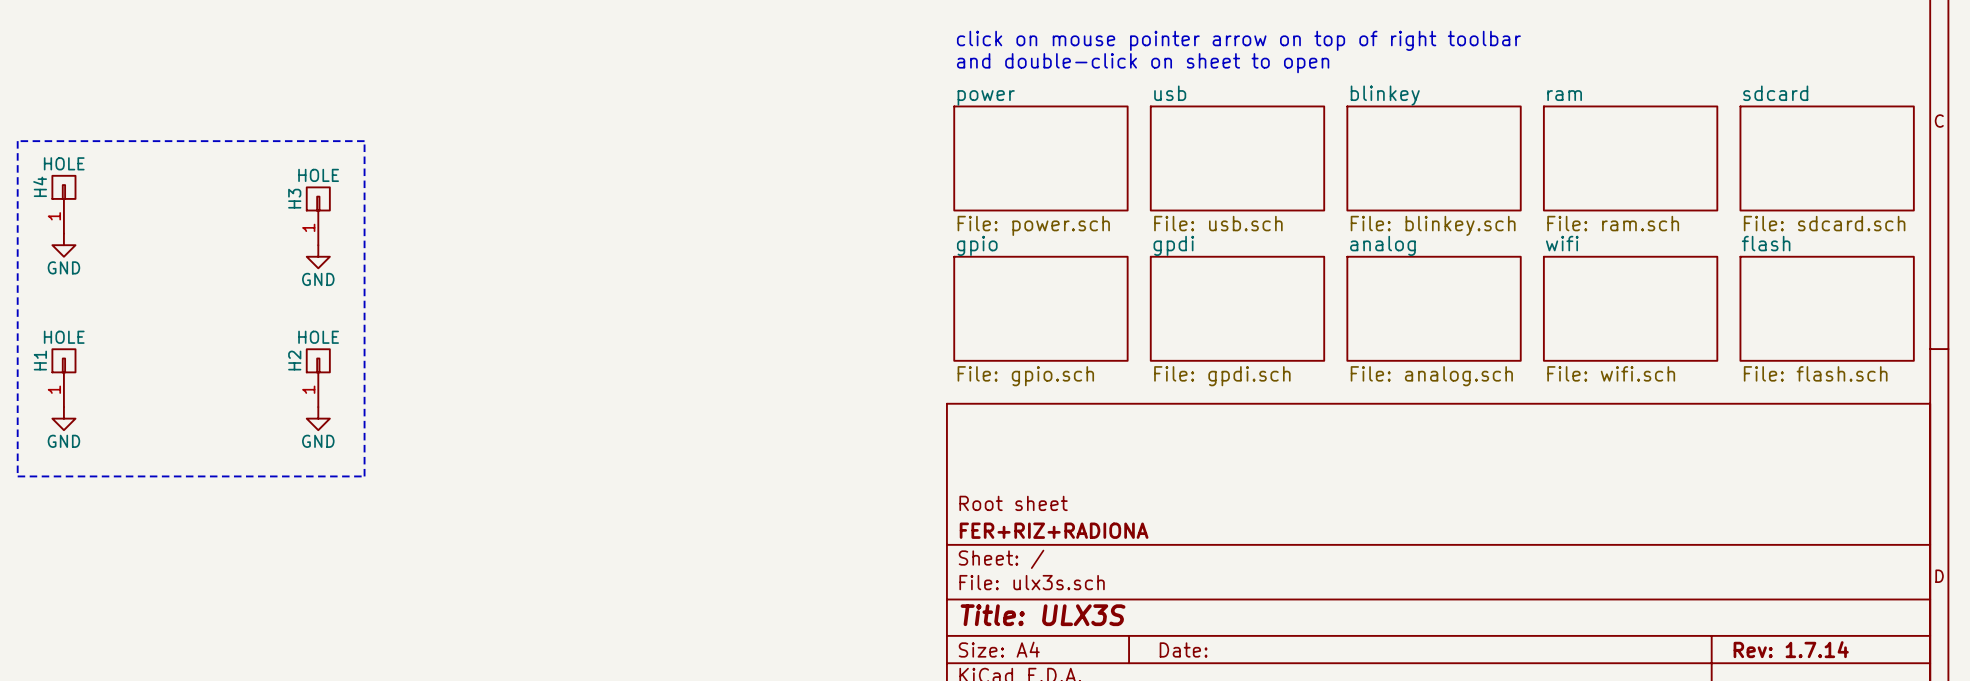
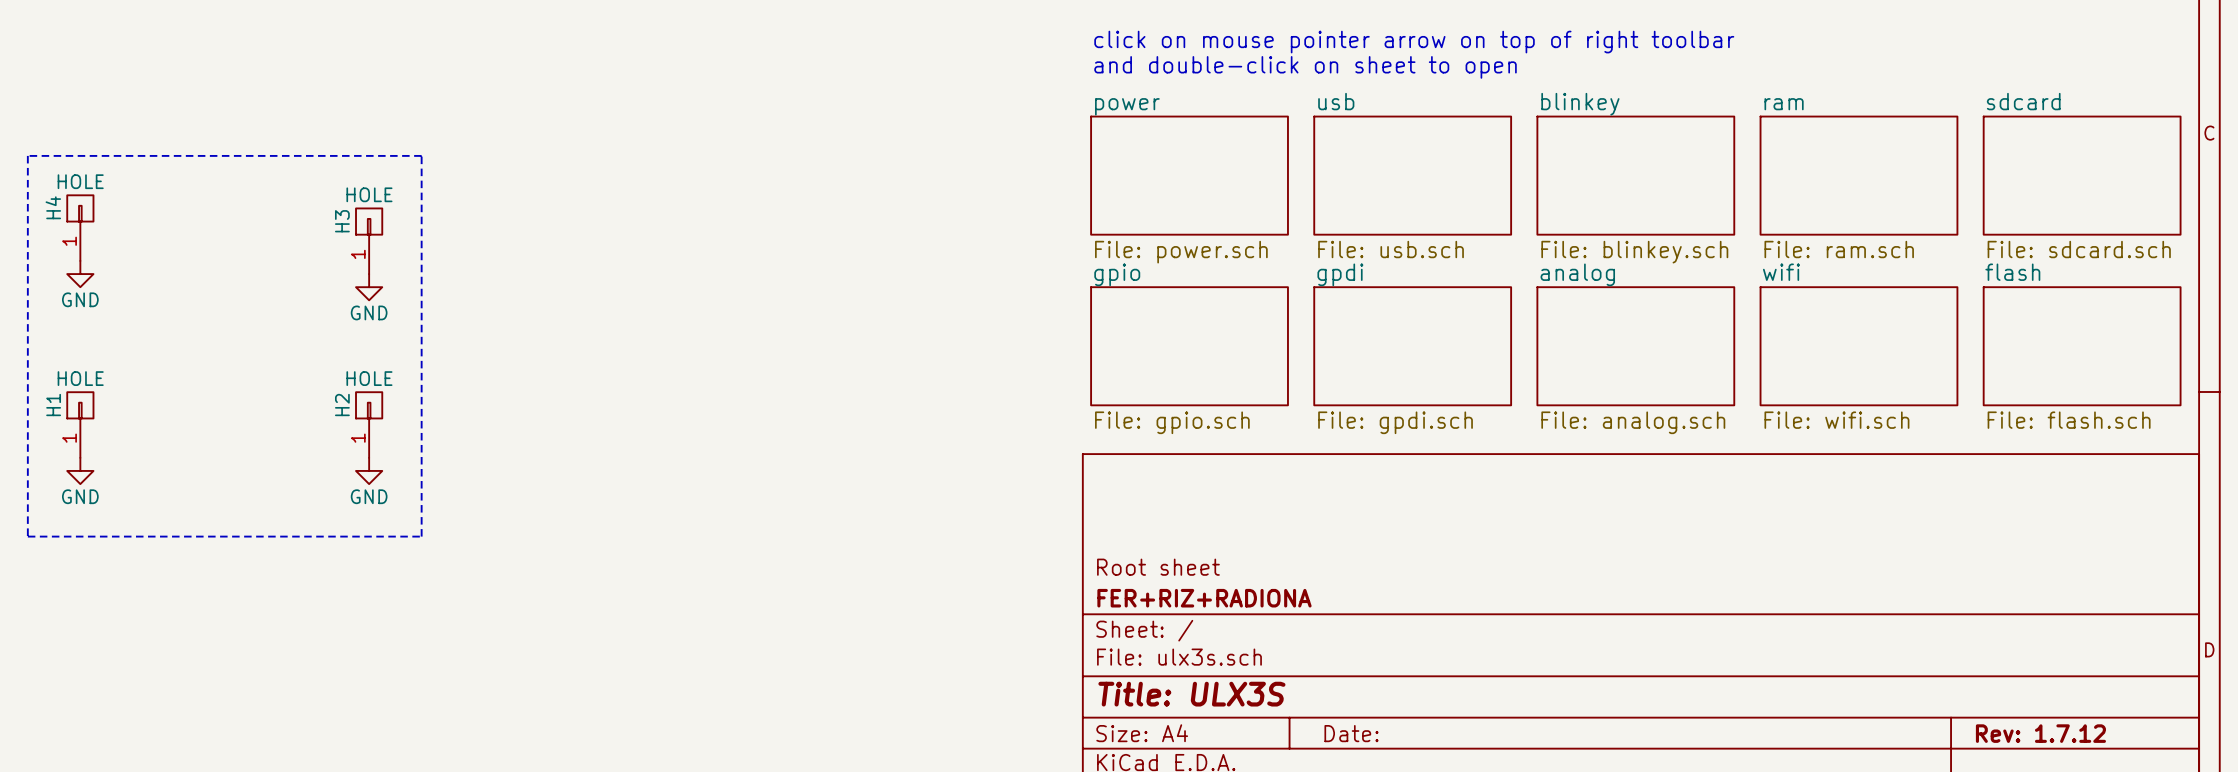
title block: Rev: 1.7.14 (1791, 649) -> Rev: 1.7.12 (2040, 733)

